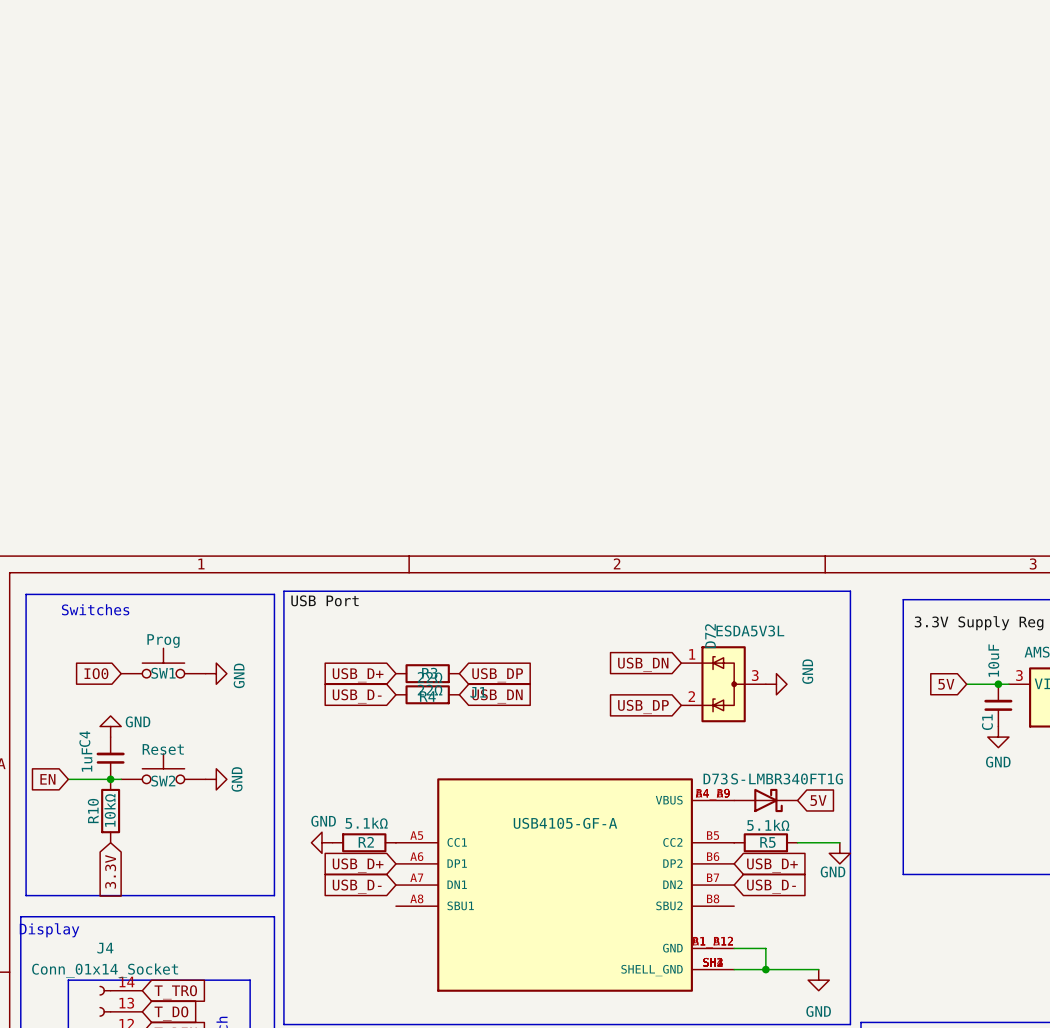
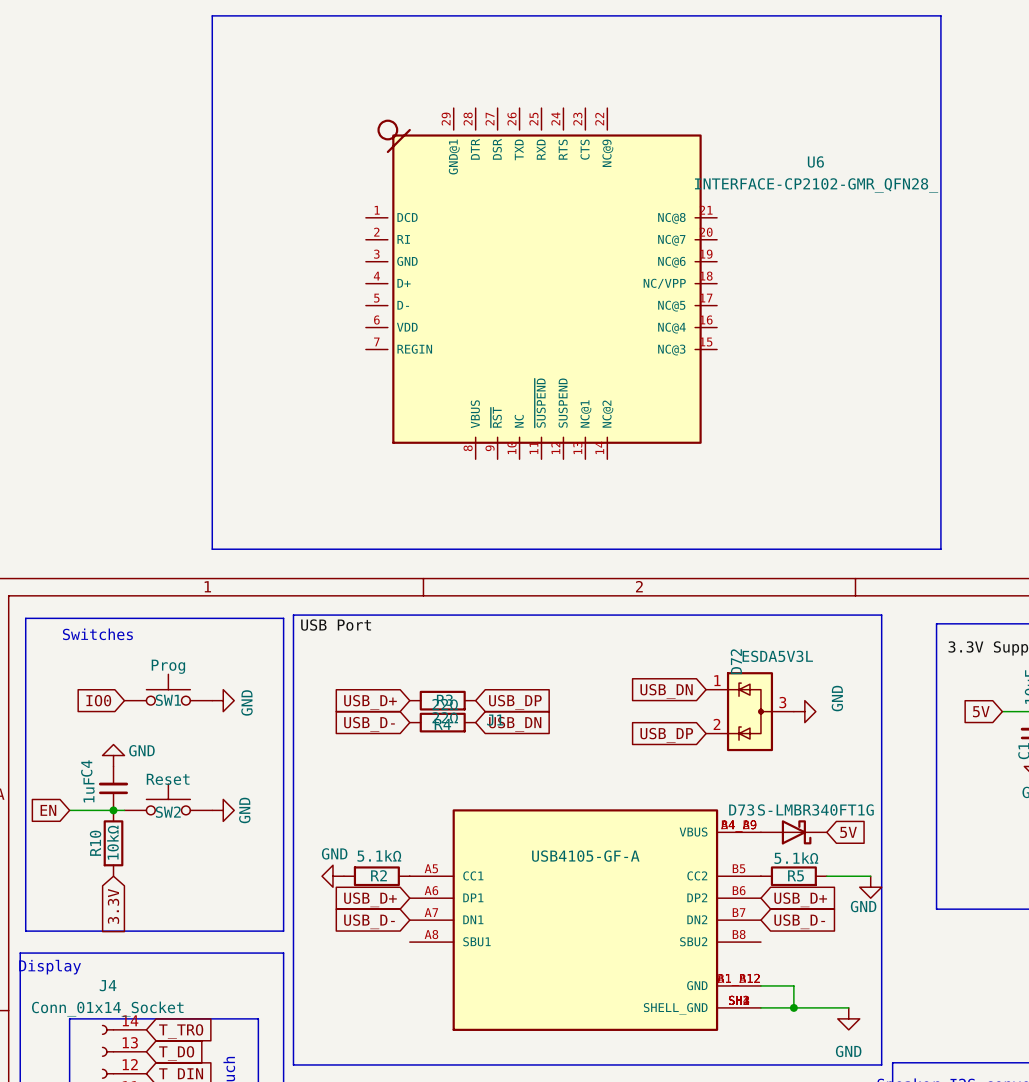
line: none -> (212, 15) (940, 15) (940, 549) (212, 549) (212, 15)
U6: none -> INTERFACE-CP2102-GMR_QFN28_ (541, 283)

